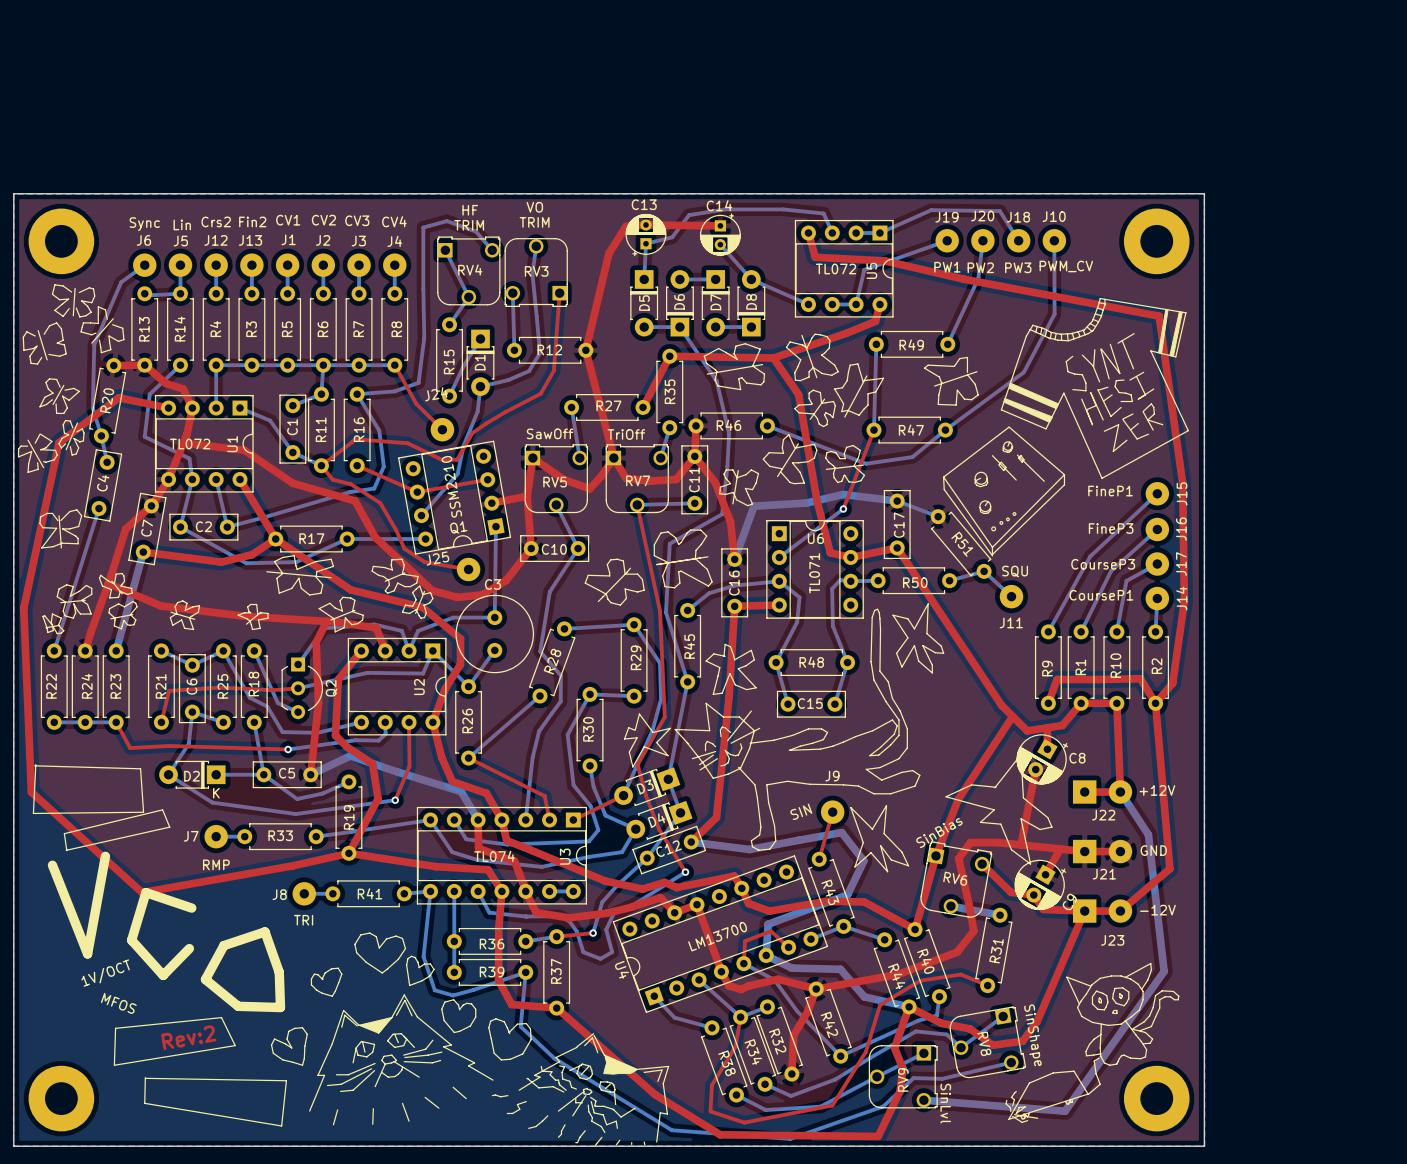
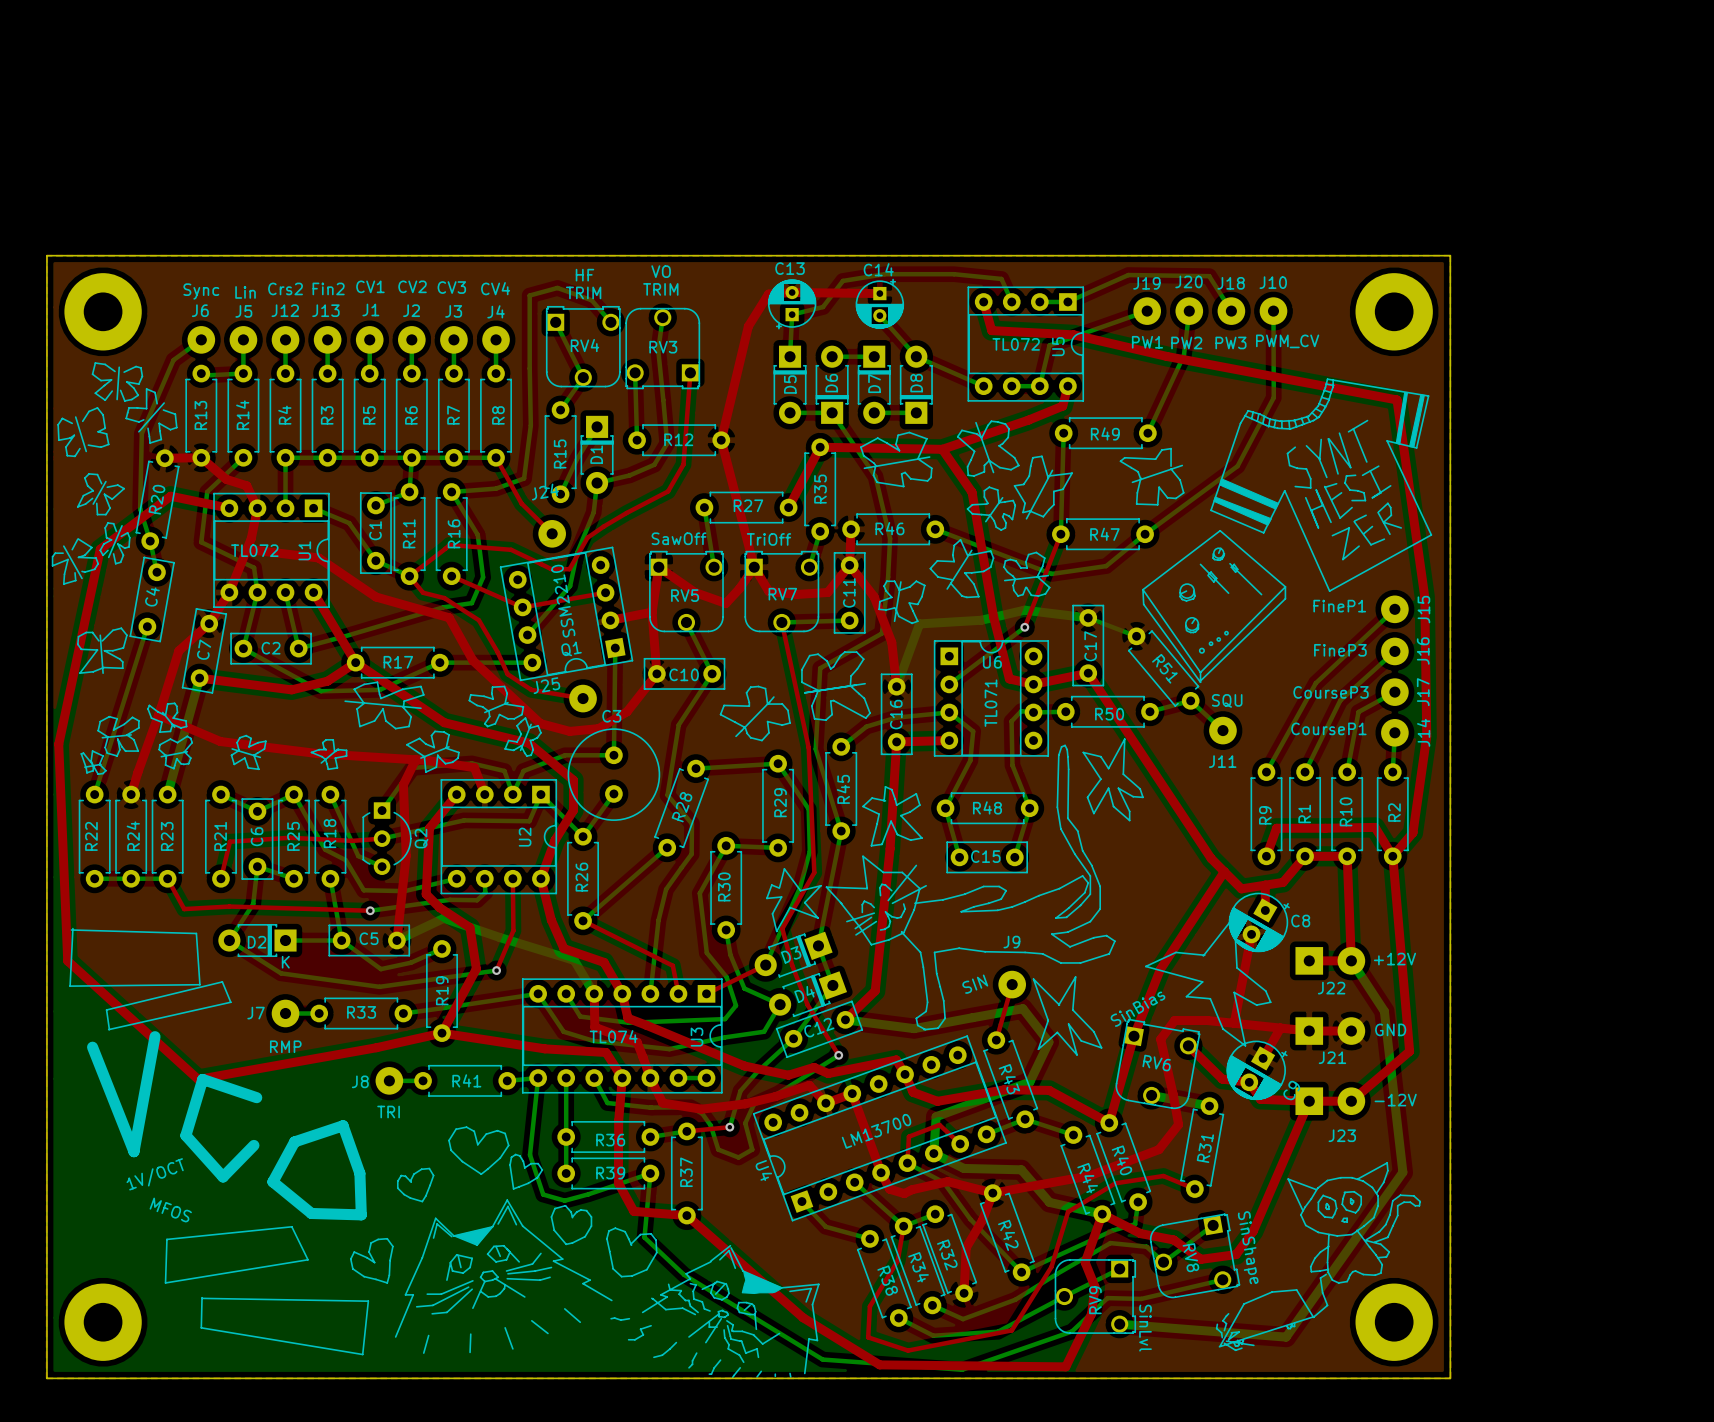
text: Rev:2 (188, 1037) -> none

